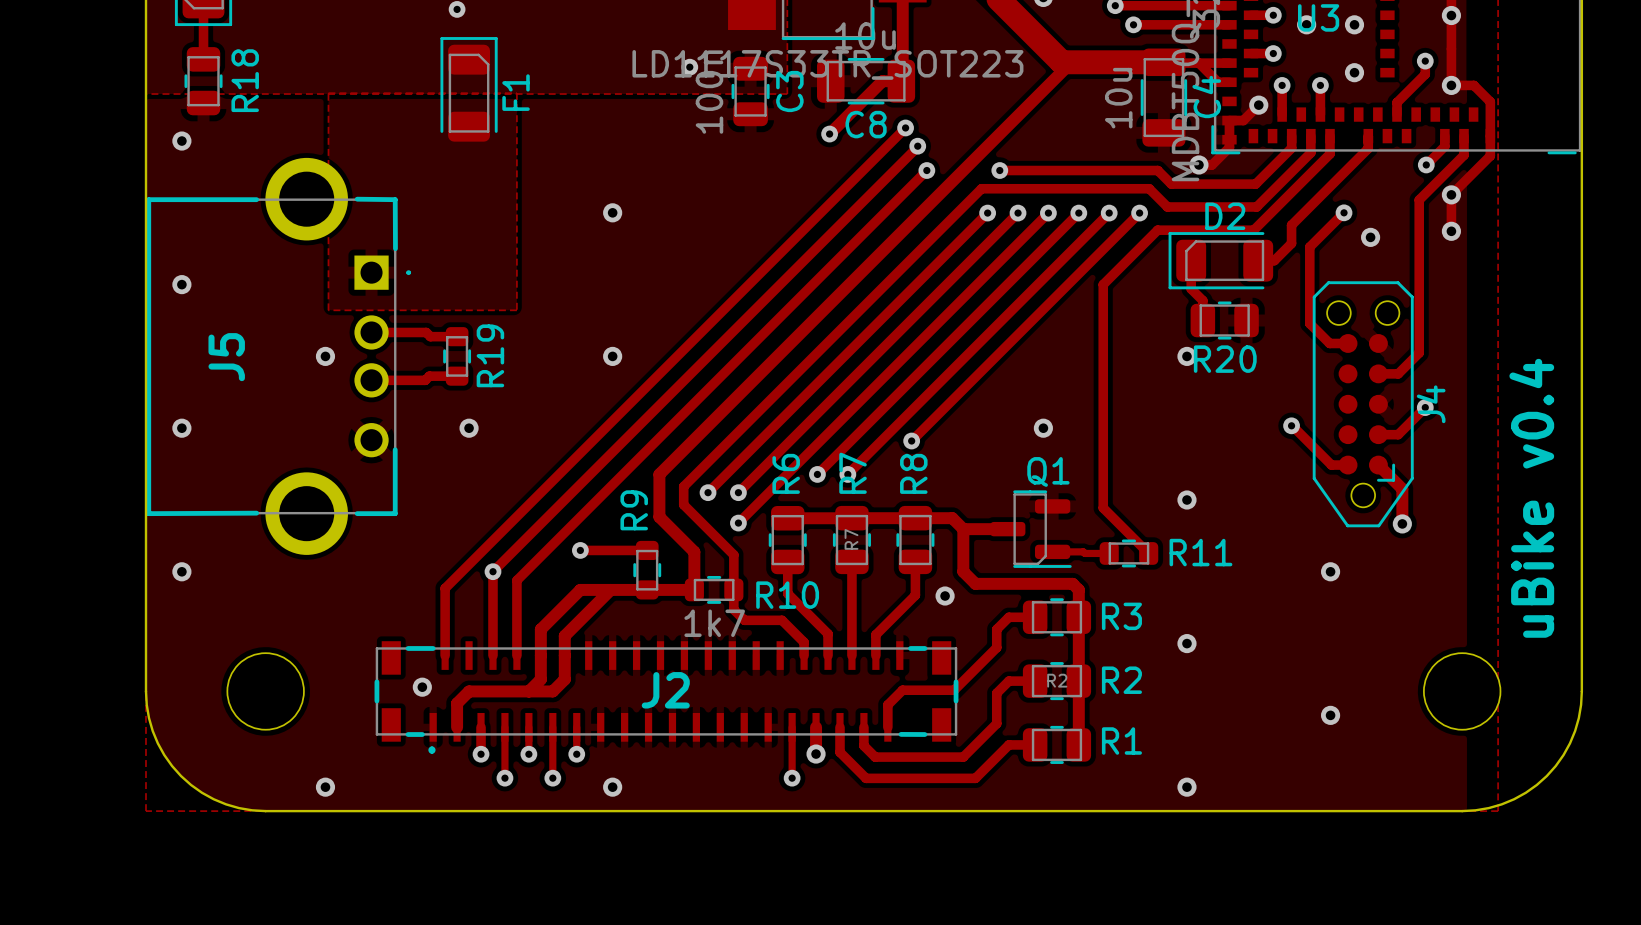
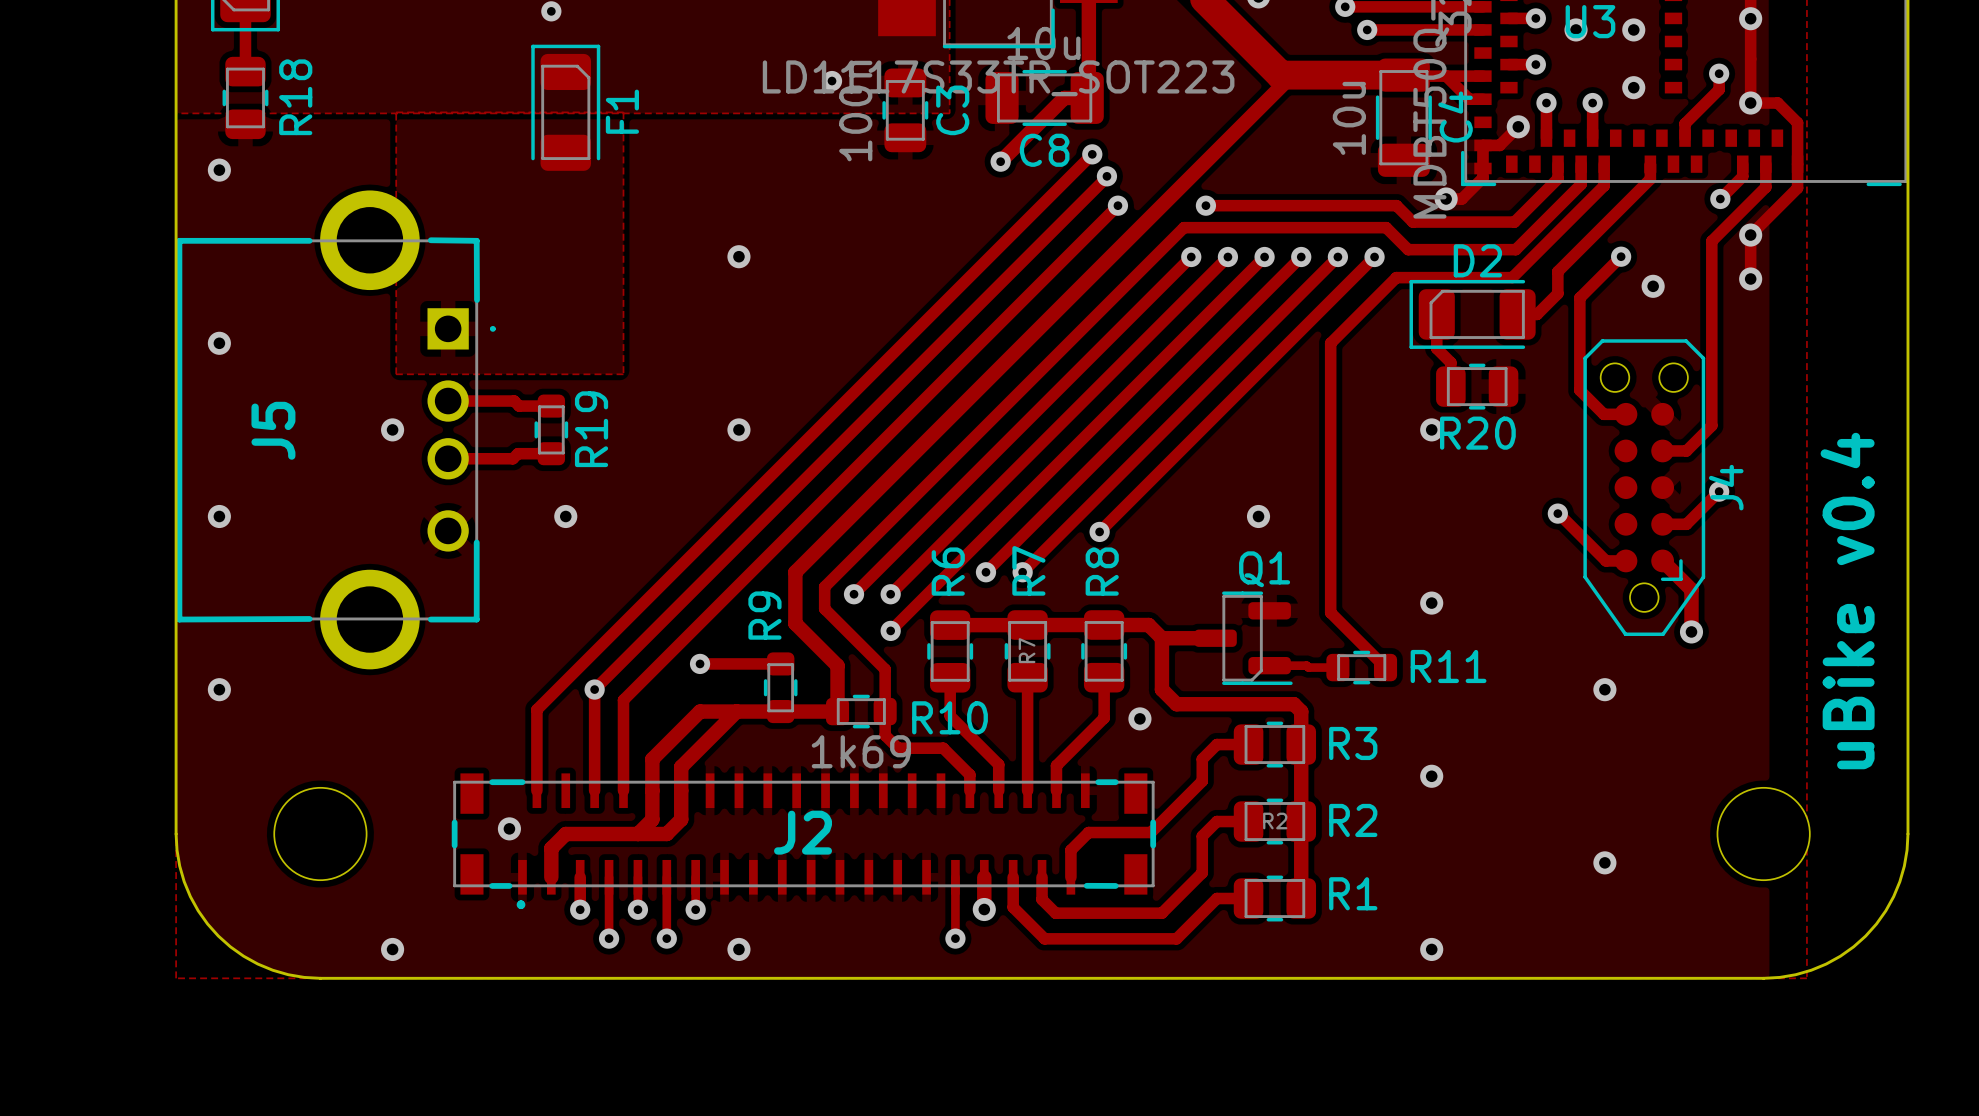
R10 value: 1k7 (714, 623) -> 1k69 (861, 751)

